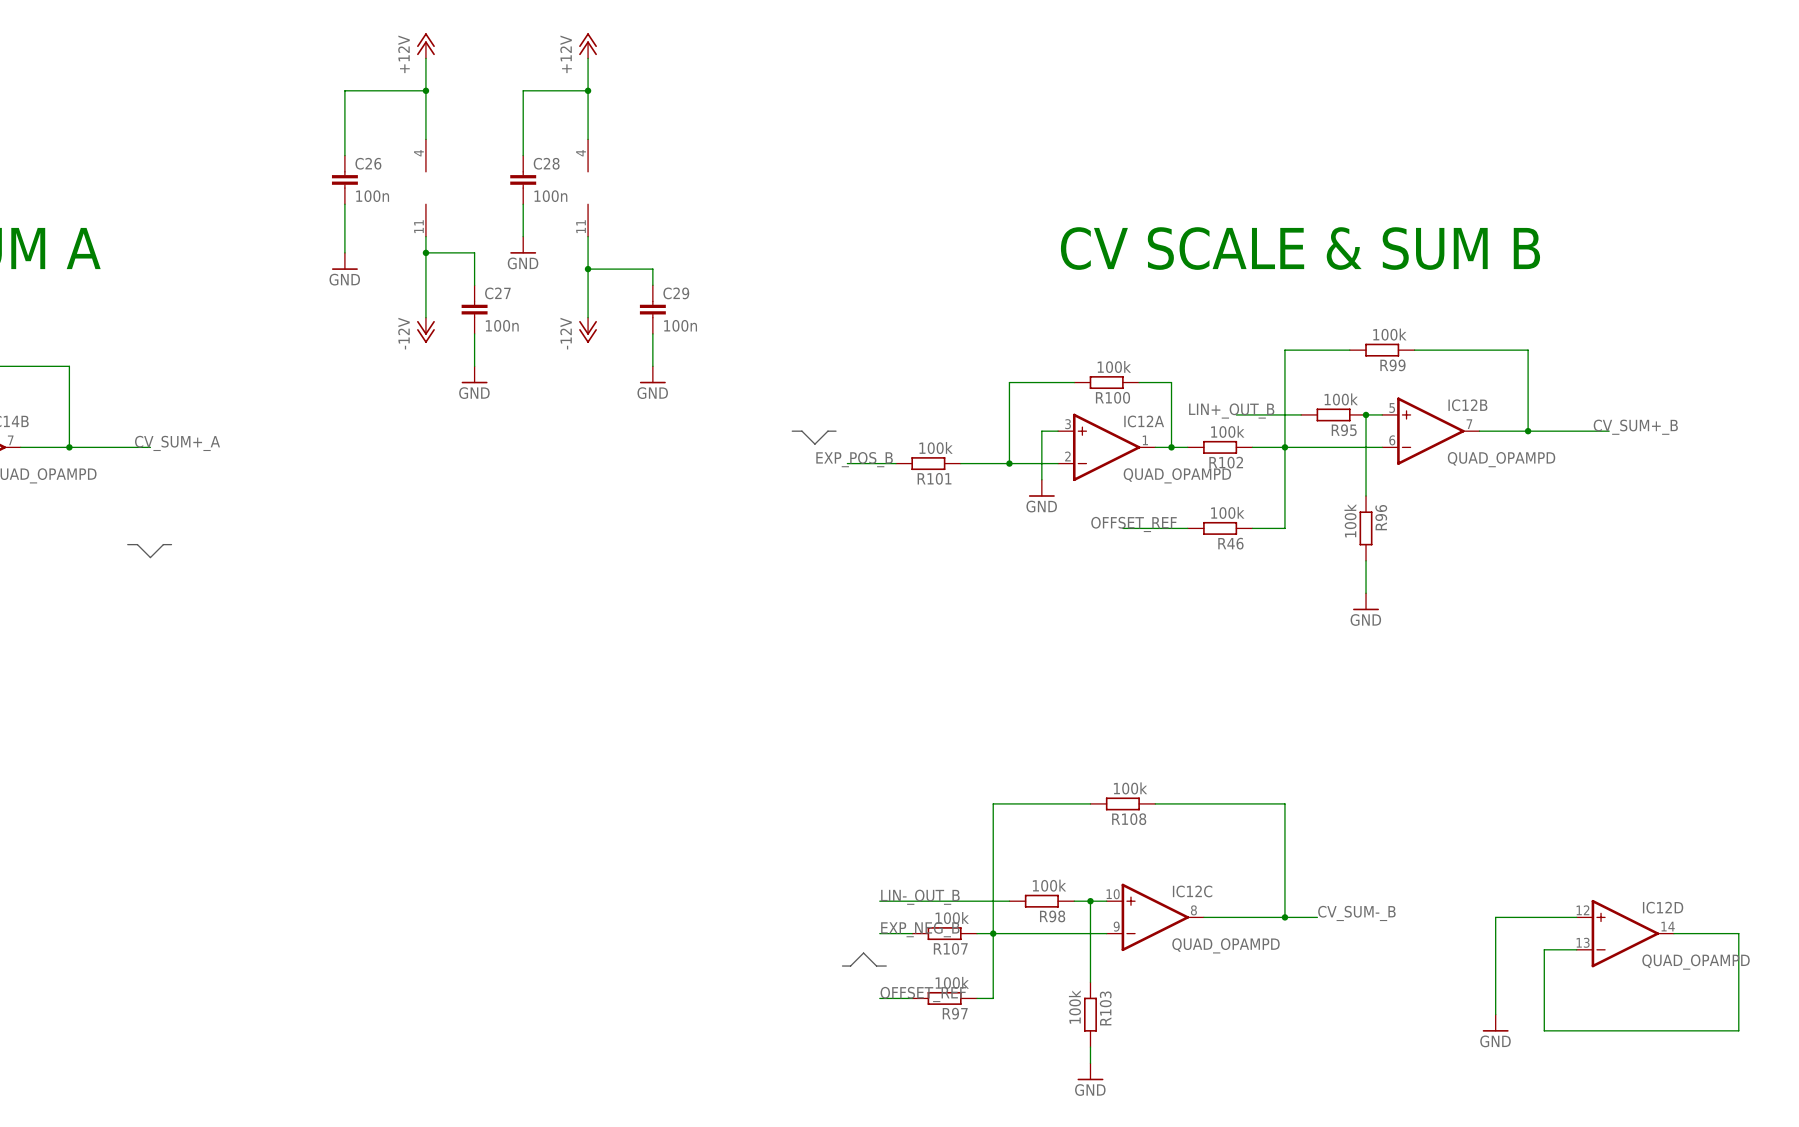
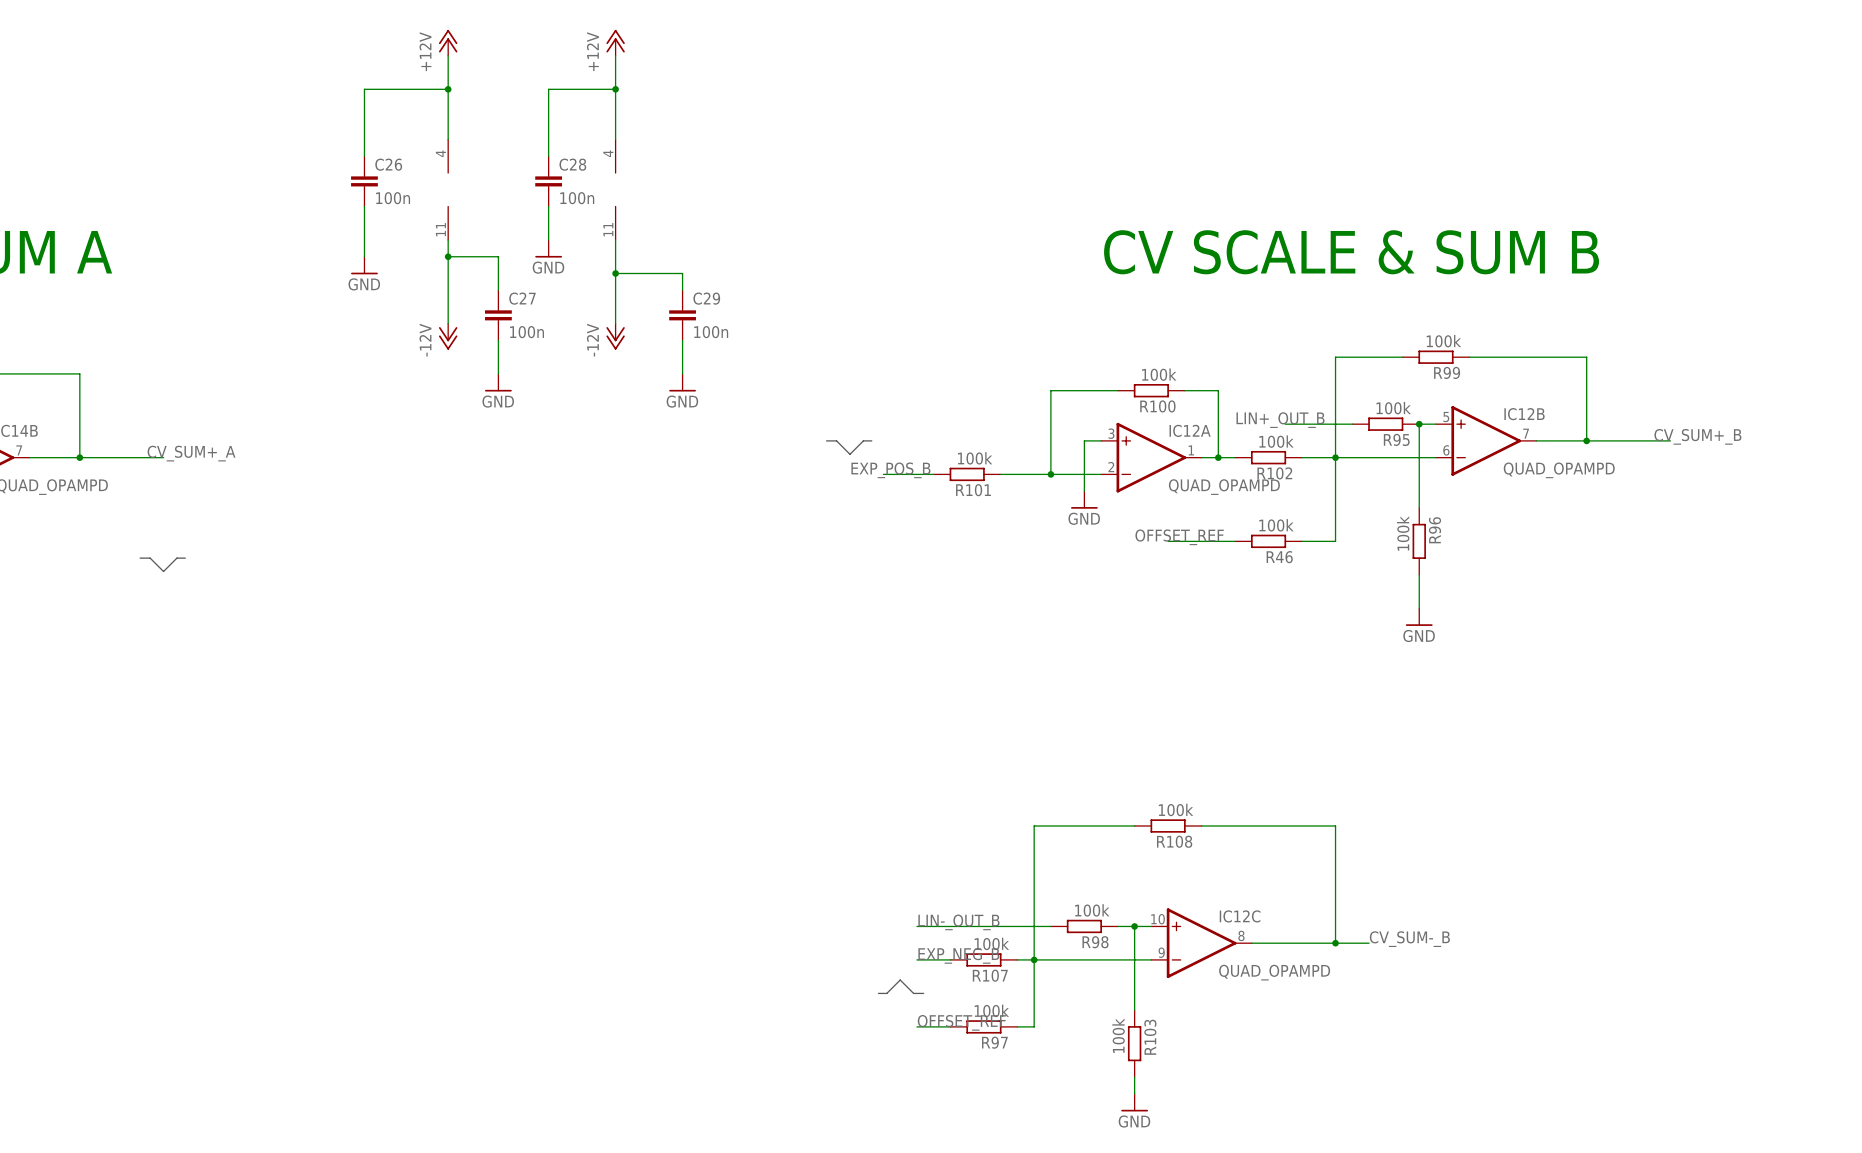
wire: (1576, 917) (1495, 917) (1495, 1014) -> none
IC12D: QUAD_OPAMPD (1625, 933) -> none
wire: (1673, 933) (1738, 933) (1738, 1030) (1544, 1030) (1544, 949) (1576, 949) -> none
power symbol: GND (1495, 1023) -> none

